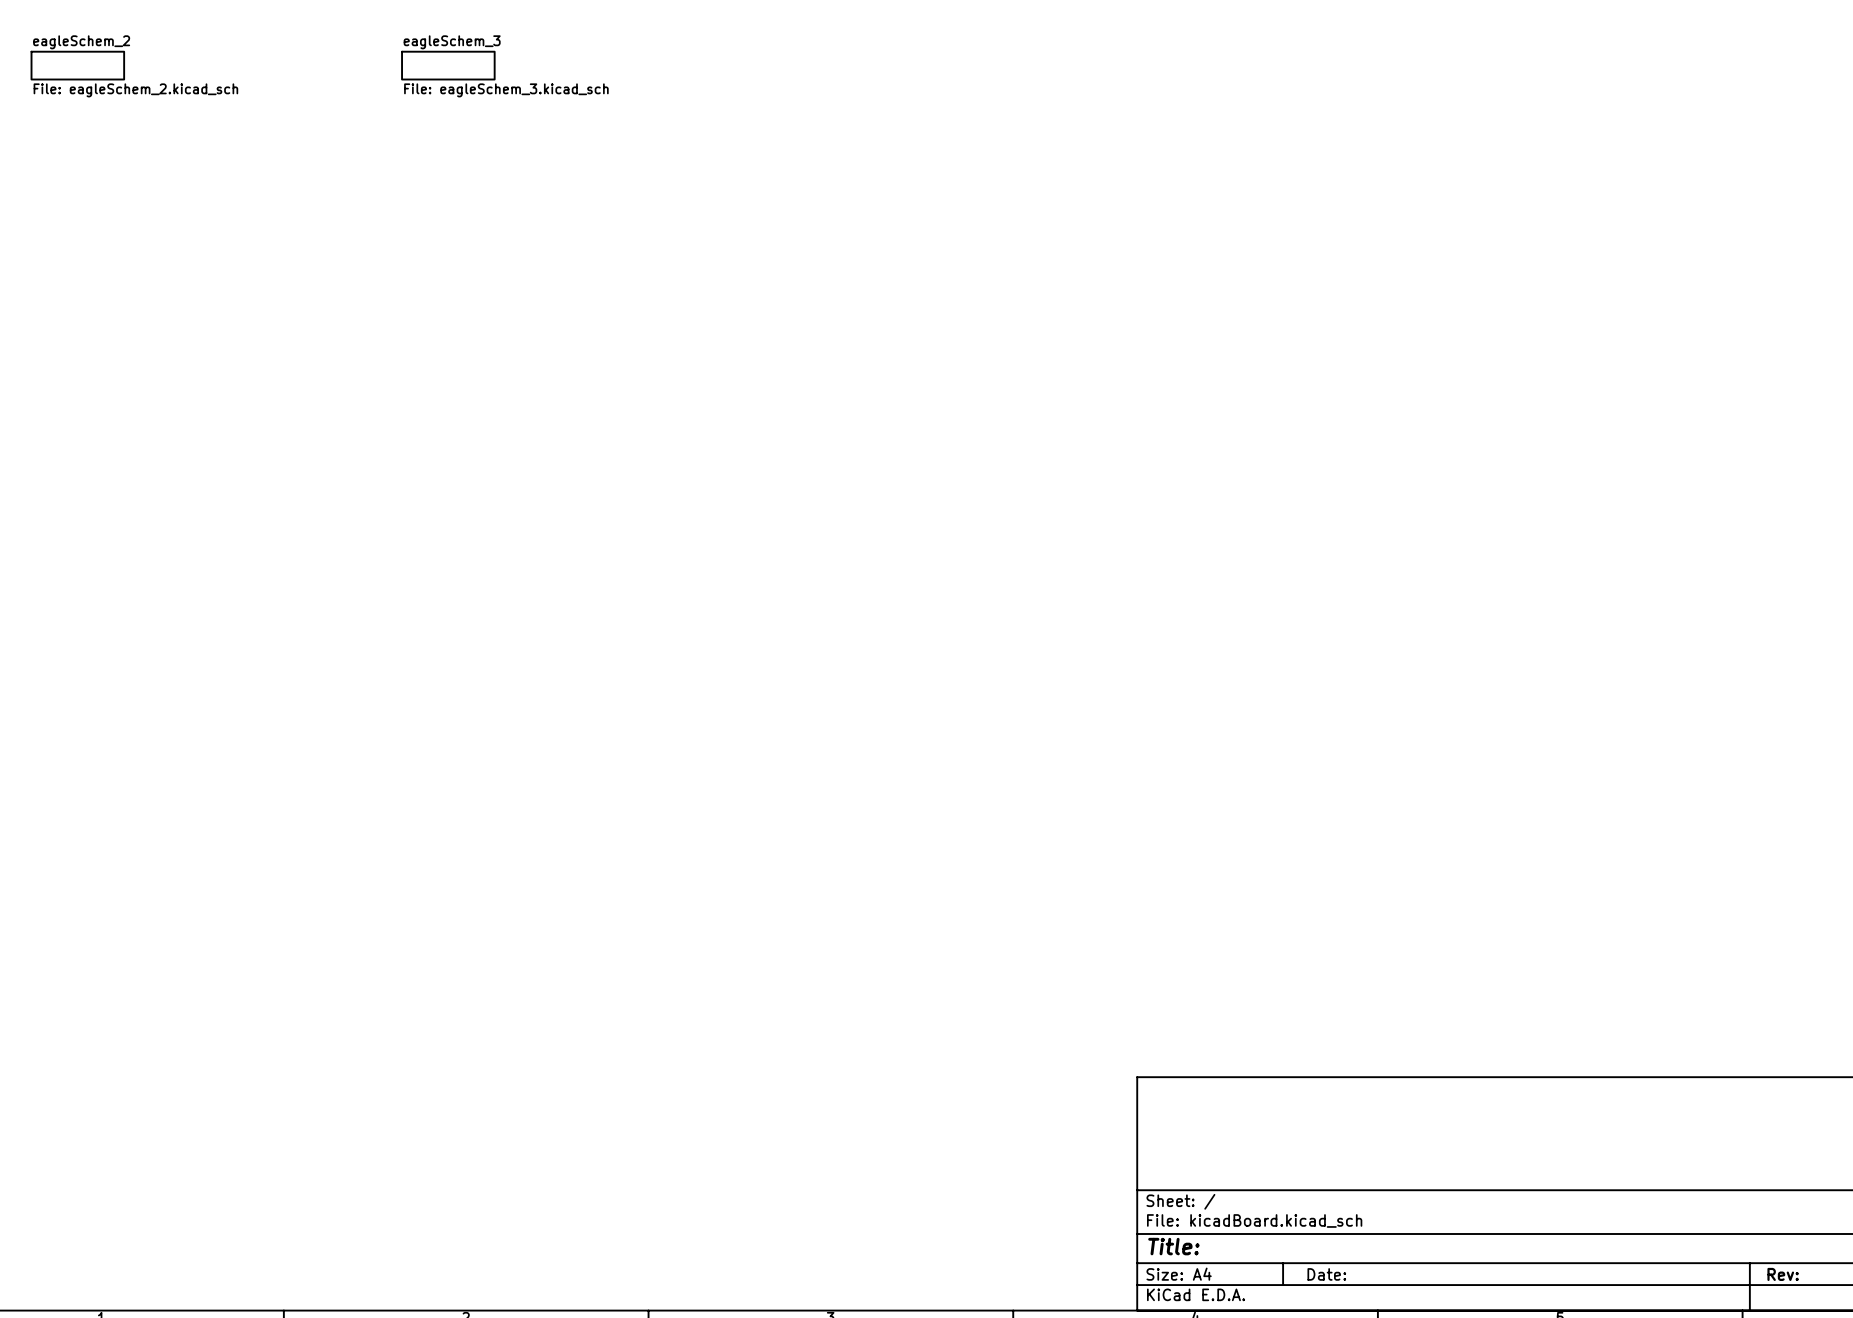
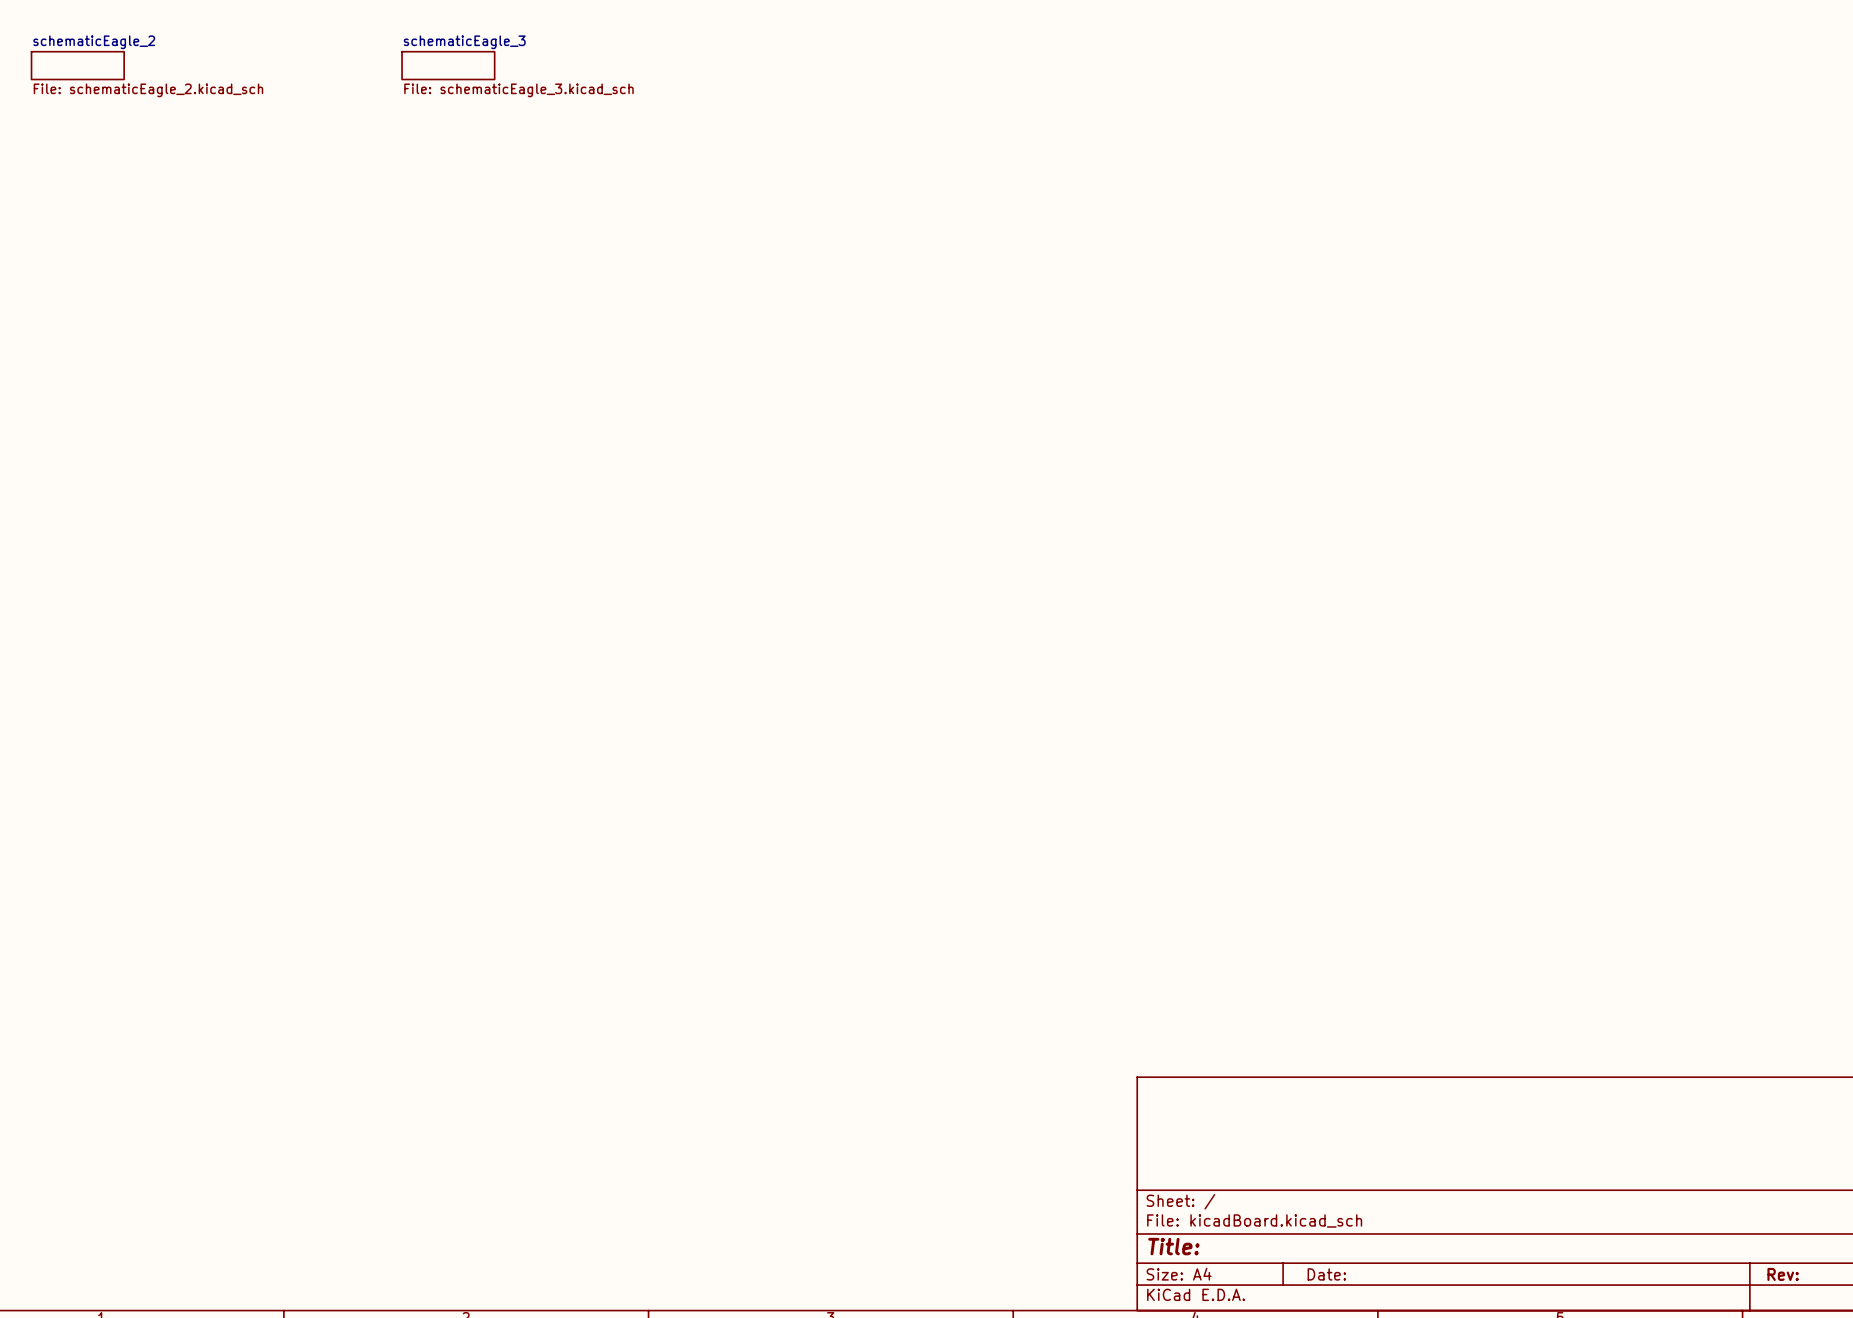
sheet eagleSchem_2 name: eagleSchem_2 (81, 42) -> schematicEagle_2 (94, 42)
sheet eagleSchem_3 name: eagleSchem_3 (452, 42) -> schematicEagle_3 (464, 42)
sheet eagleSchem_2 value: File: eagleSchem_2.kicad_sch (135, 90) -> File: schematicEagle_2.kicad_sch (148, 90)
sheet eagleSchem_3 value: File: eagleSchem_3.kicad_sch (506, 90) -> File: schematicEagle_3.kicad_sch (518, 90)

